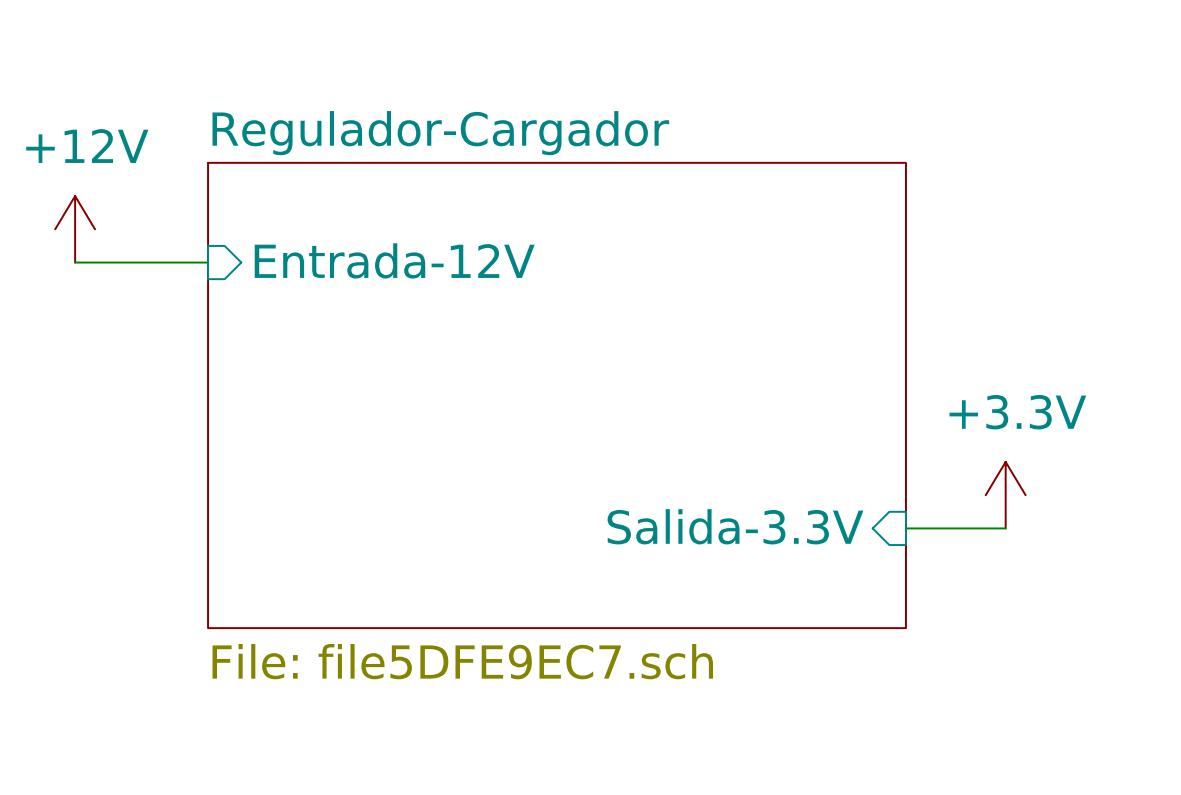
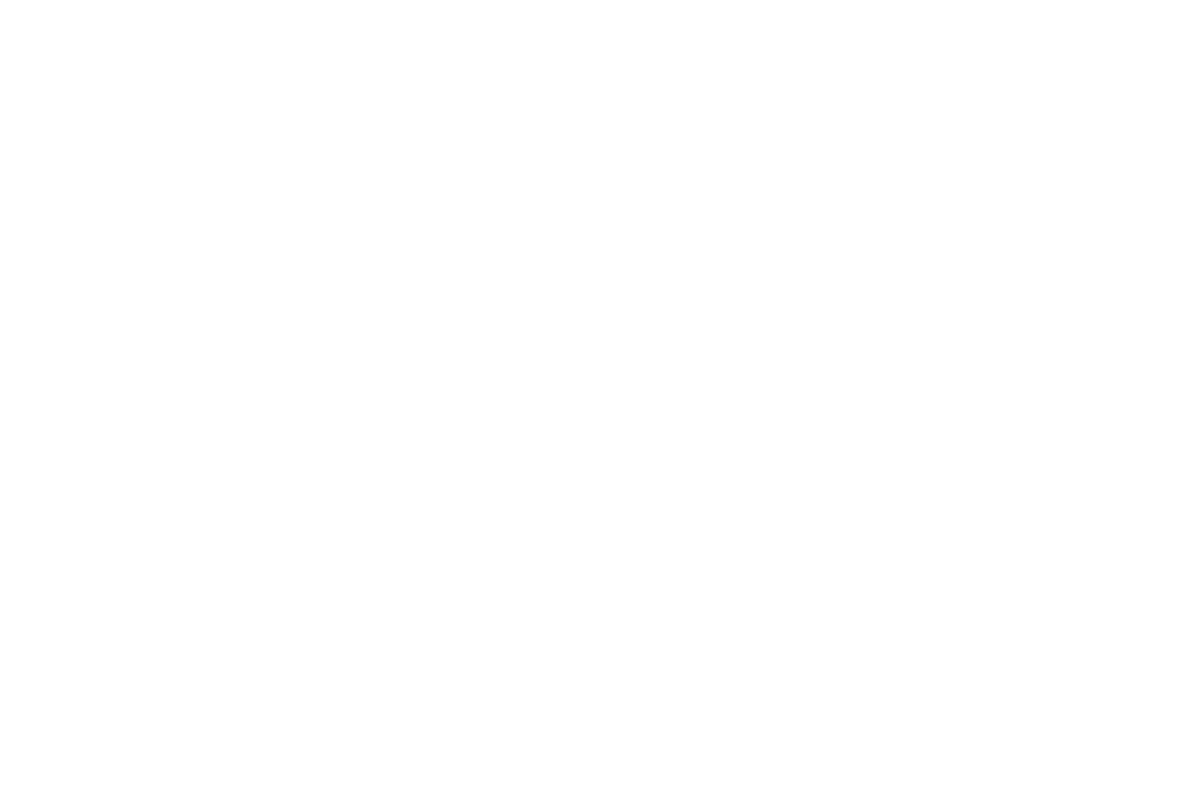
power symbol: +12V (75, 229) -> none
sheet pin: Entrada-12V (394, 260) -> none
wire: (75, 262) (208, 262) -> none
sheet Regulador-Cargador: File: file5DFE9EC7.sch (557, 395) -> none
power symbol: +3.3V (1005, 495) -> none
sheet pin: Salida-3.3V (735, 526) -> none
wire: (905, 528) (1005, 528) -> none

